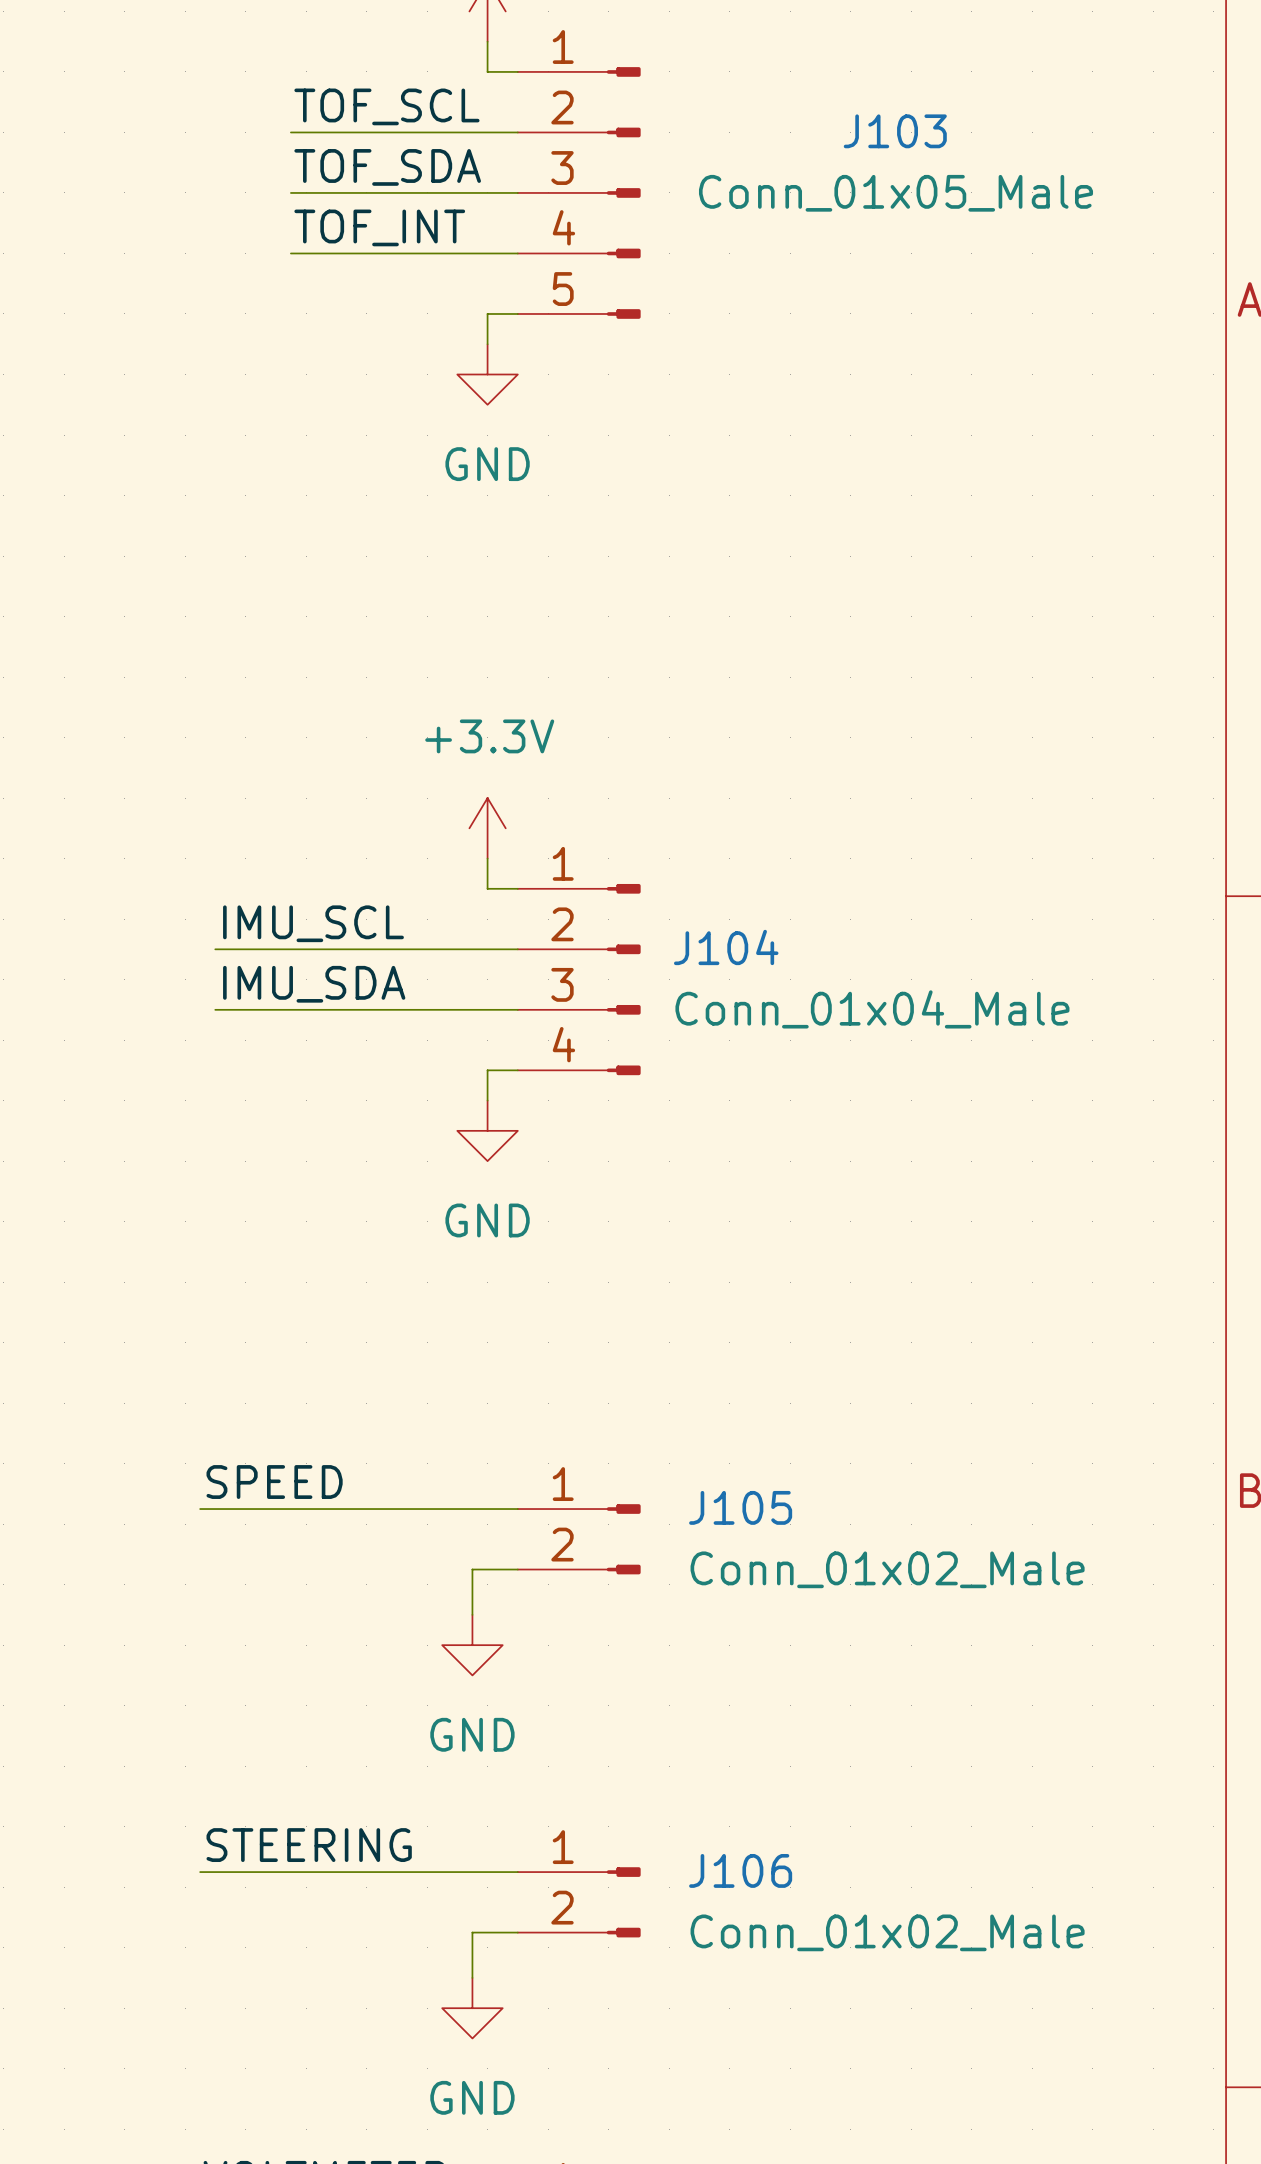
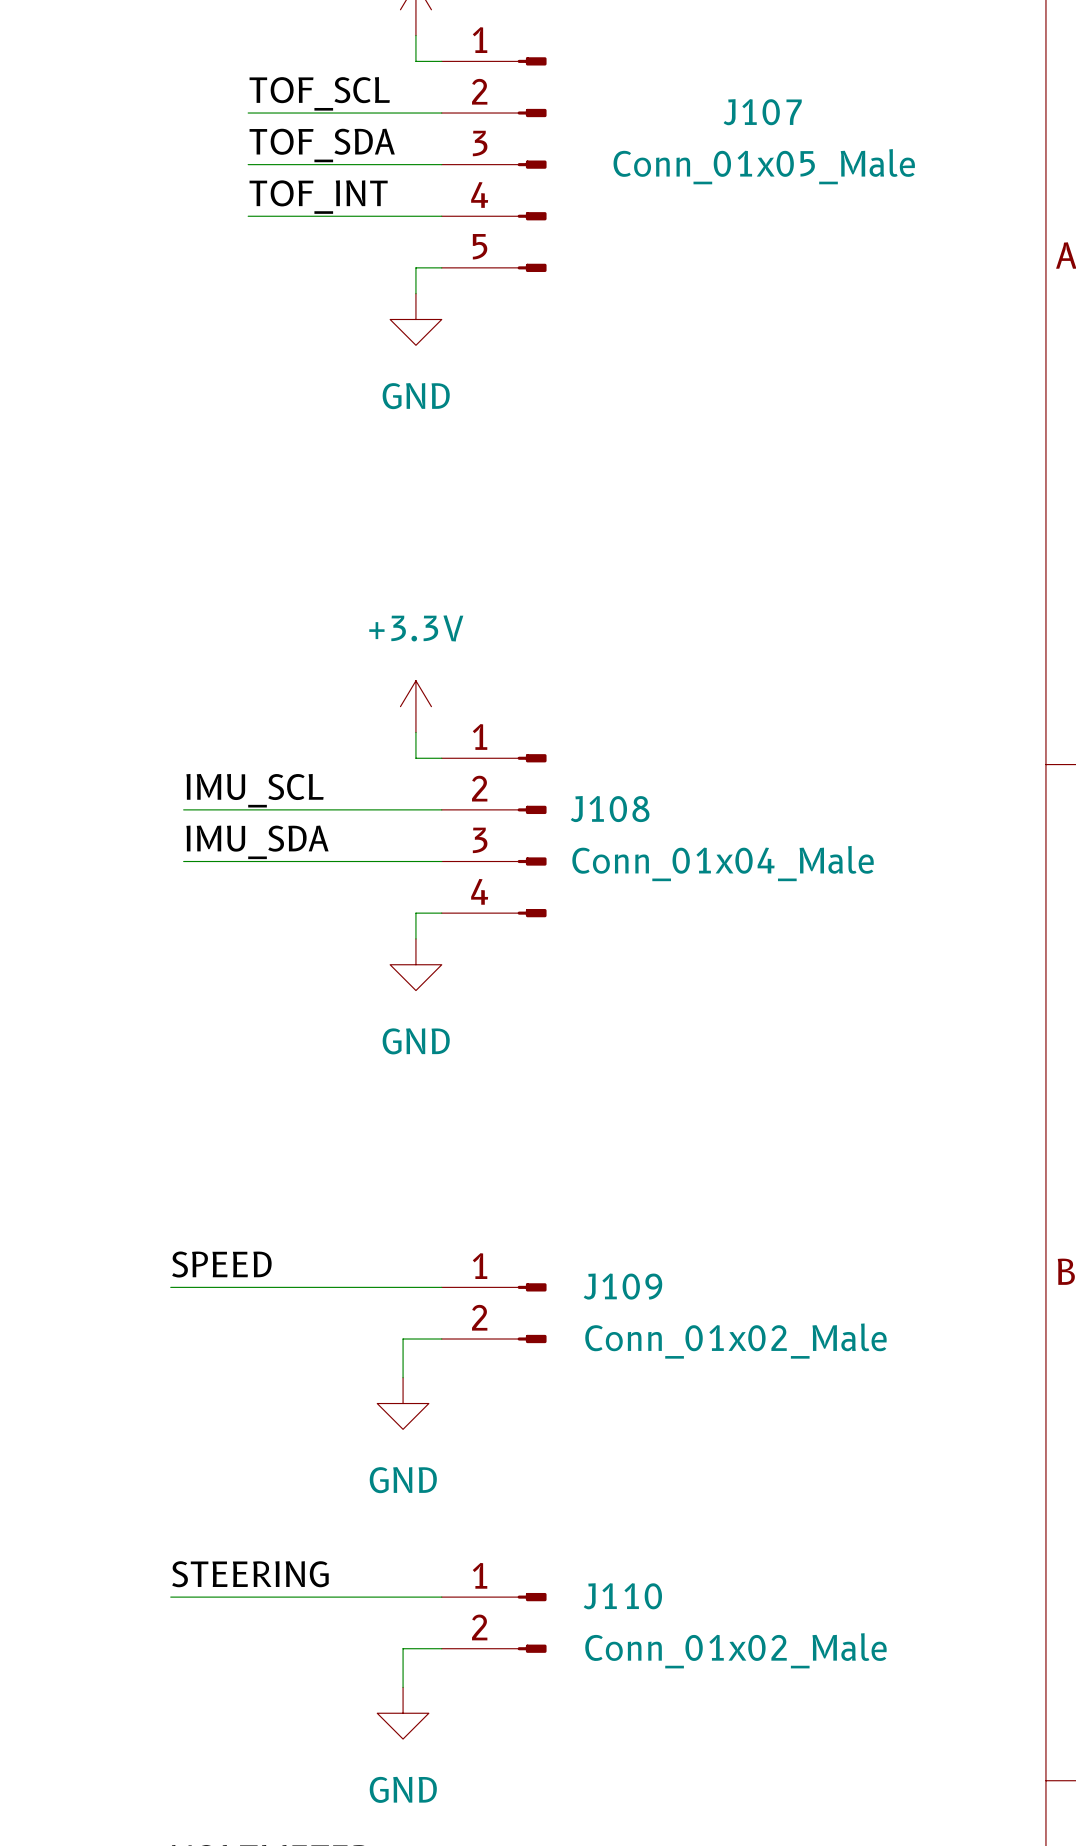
J103 name: J103 (895, 131) -> J107 (762, 112)
J104 name: J104 (726, 947) -> J108 (610, 809)
J105 name: J105 (740, 1507) -> J109 (622, 1286)
J106 name: J106 (740, 1870) -> J110 (622, 1596)

